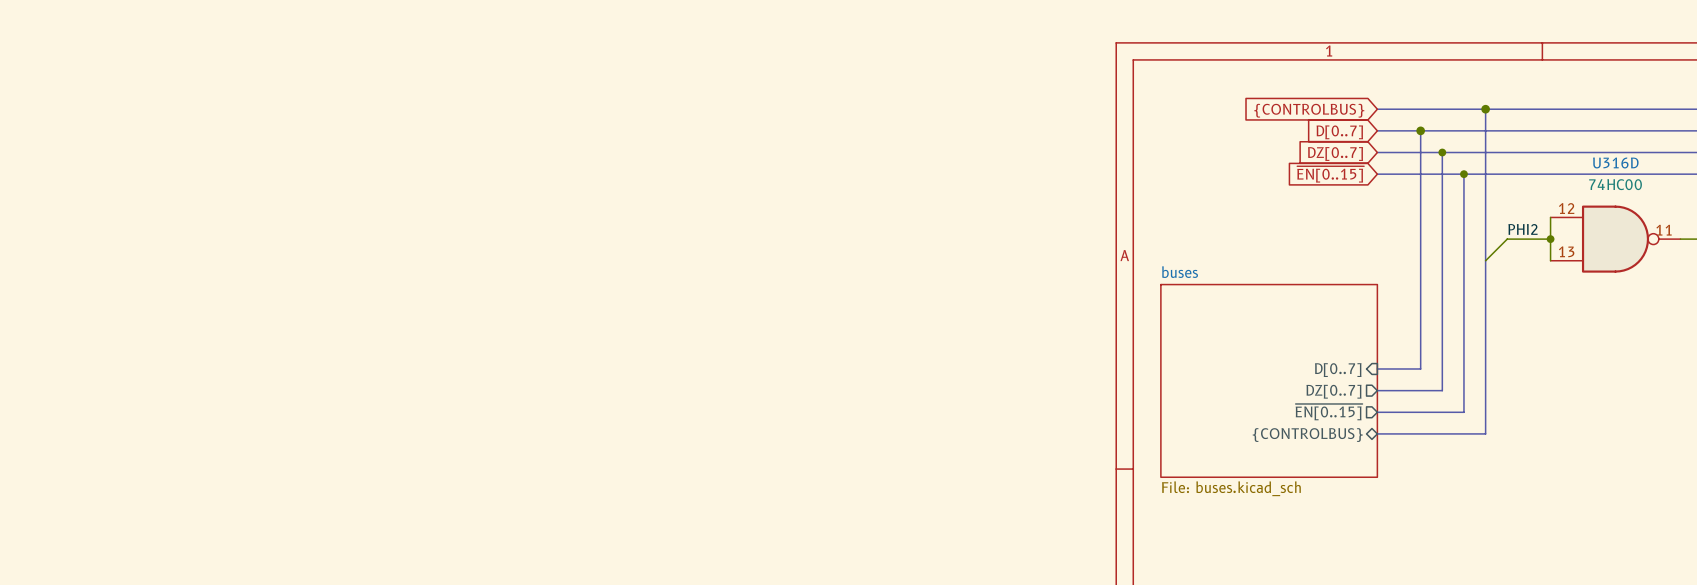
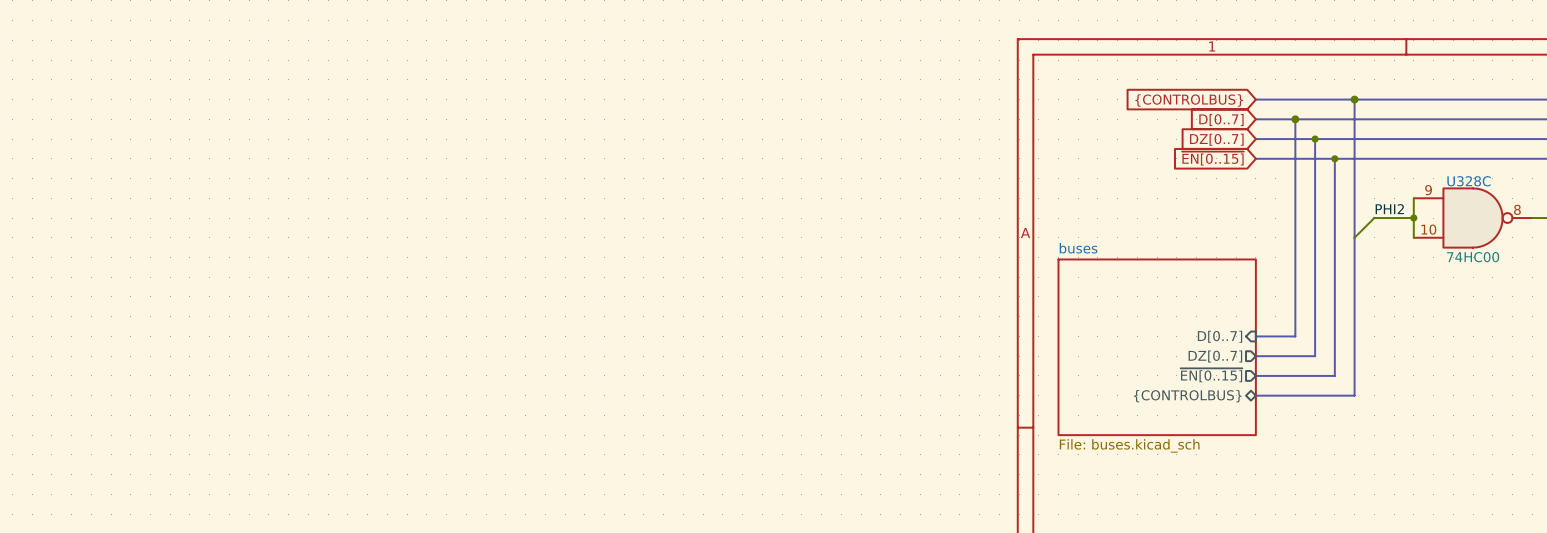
U316D name: U316D (1615, 162) -> U328C (1469, 181)
U316D value position: 74HC00 (1615, 184) -> 74HC00 (1473, 257)
U316D pin number: 12 (1566, 208) -> 9 (1428, 190)
U316D pin number: 11 (1664, 230) -> 8 (1517, 209)
U316D pin number: 13 (1566, 251) -> 10 (1428, 229)

